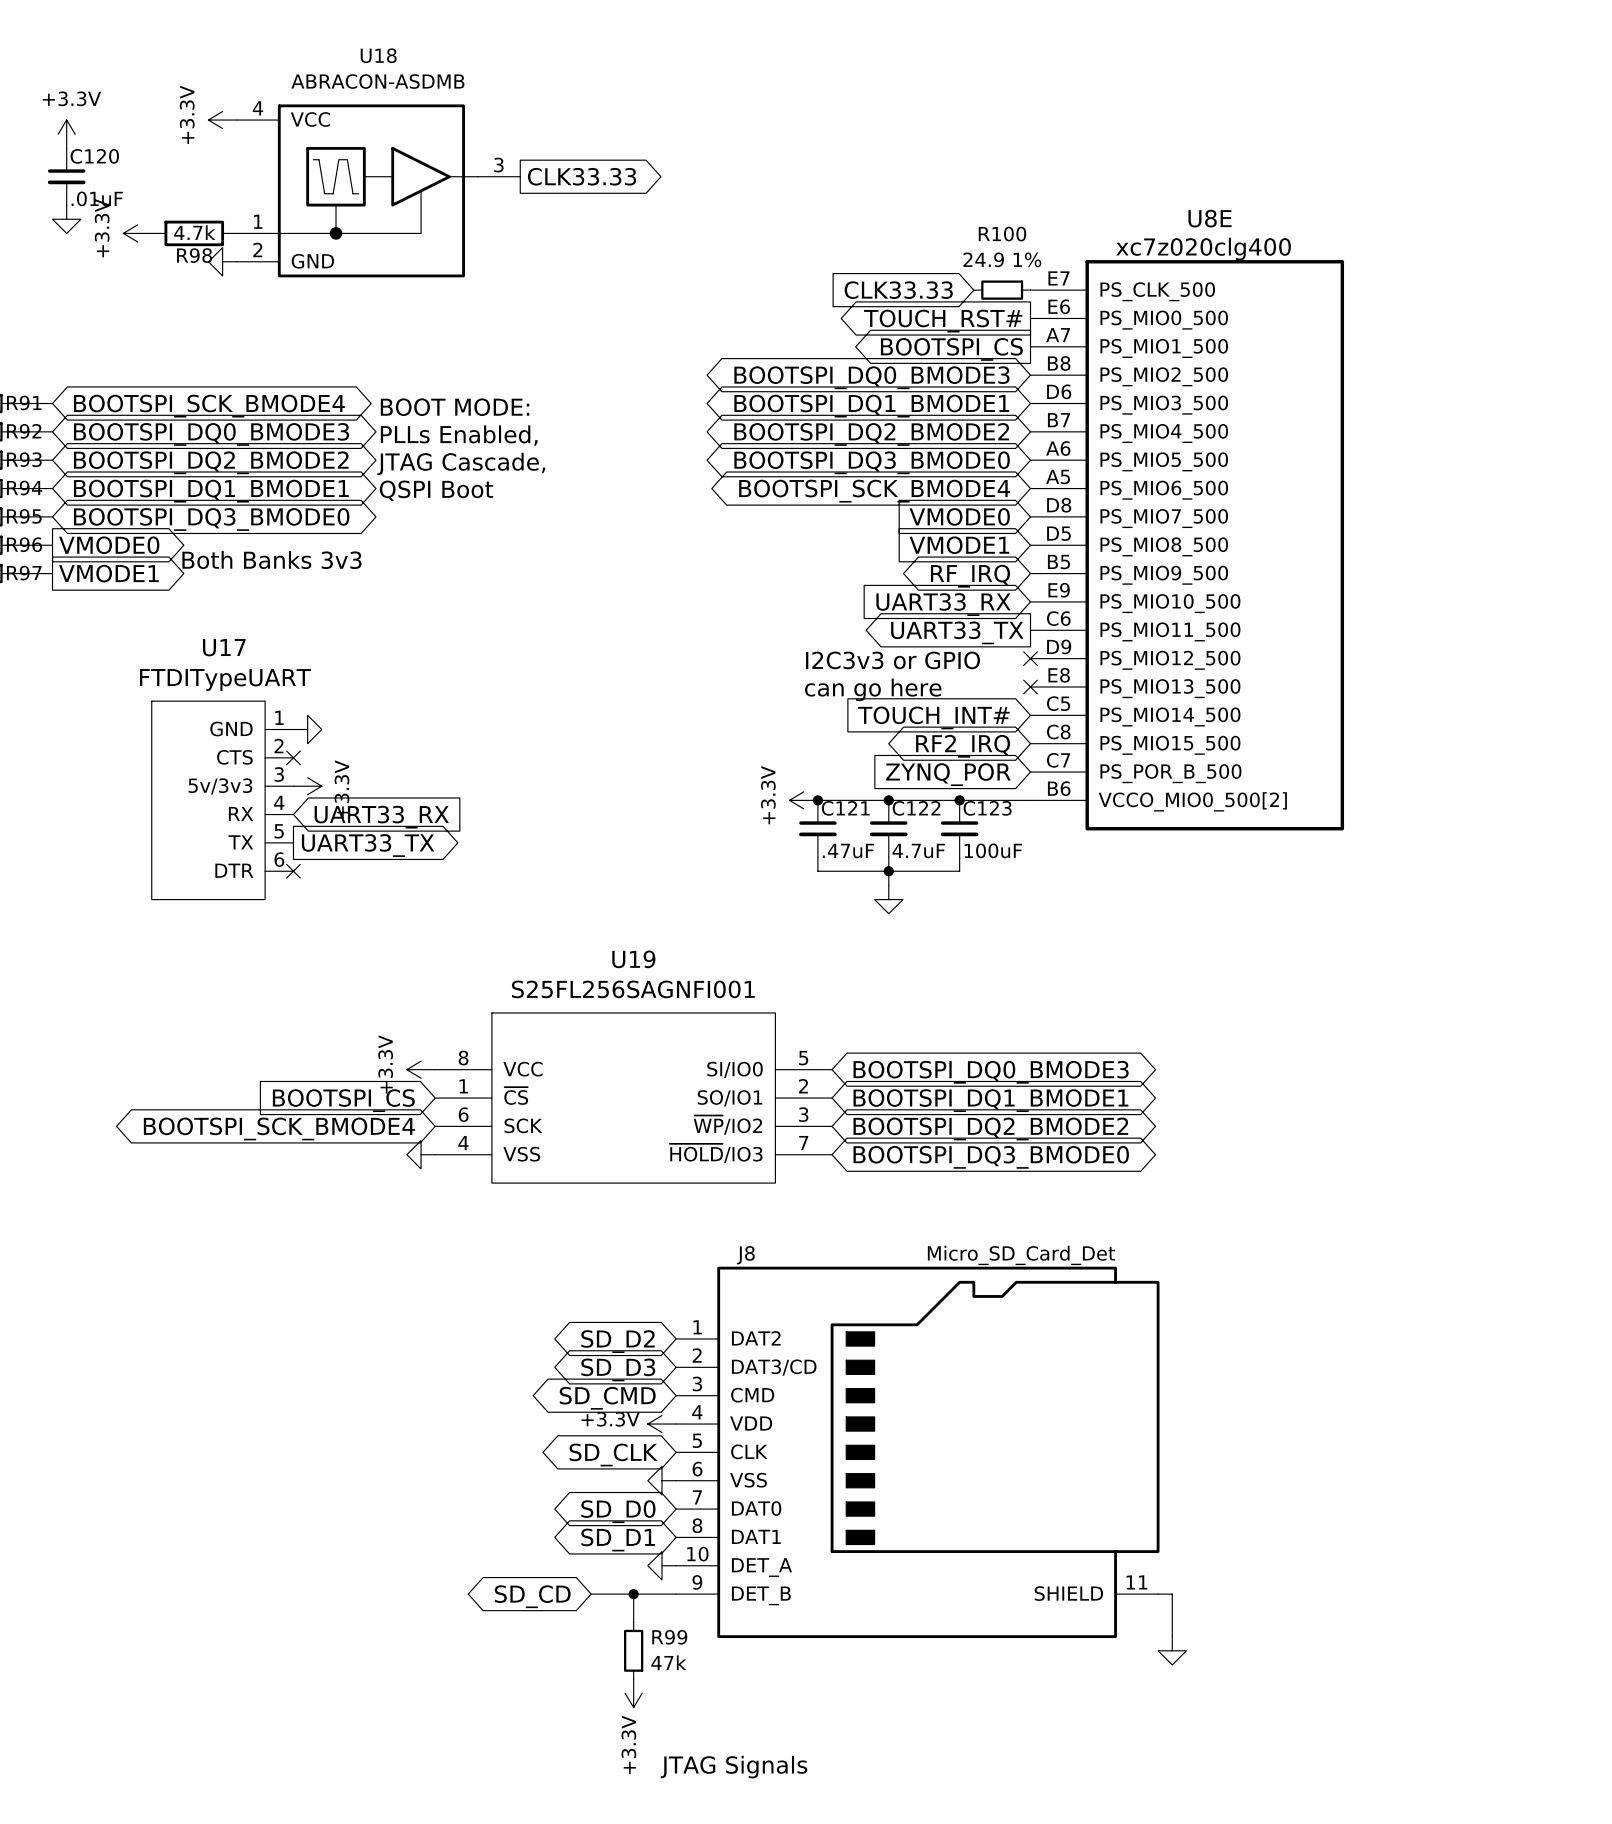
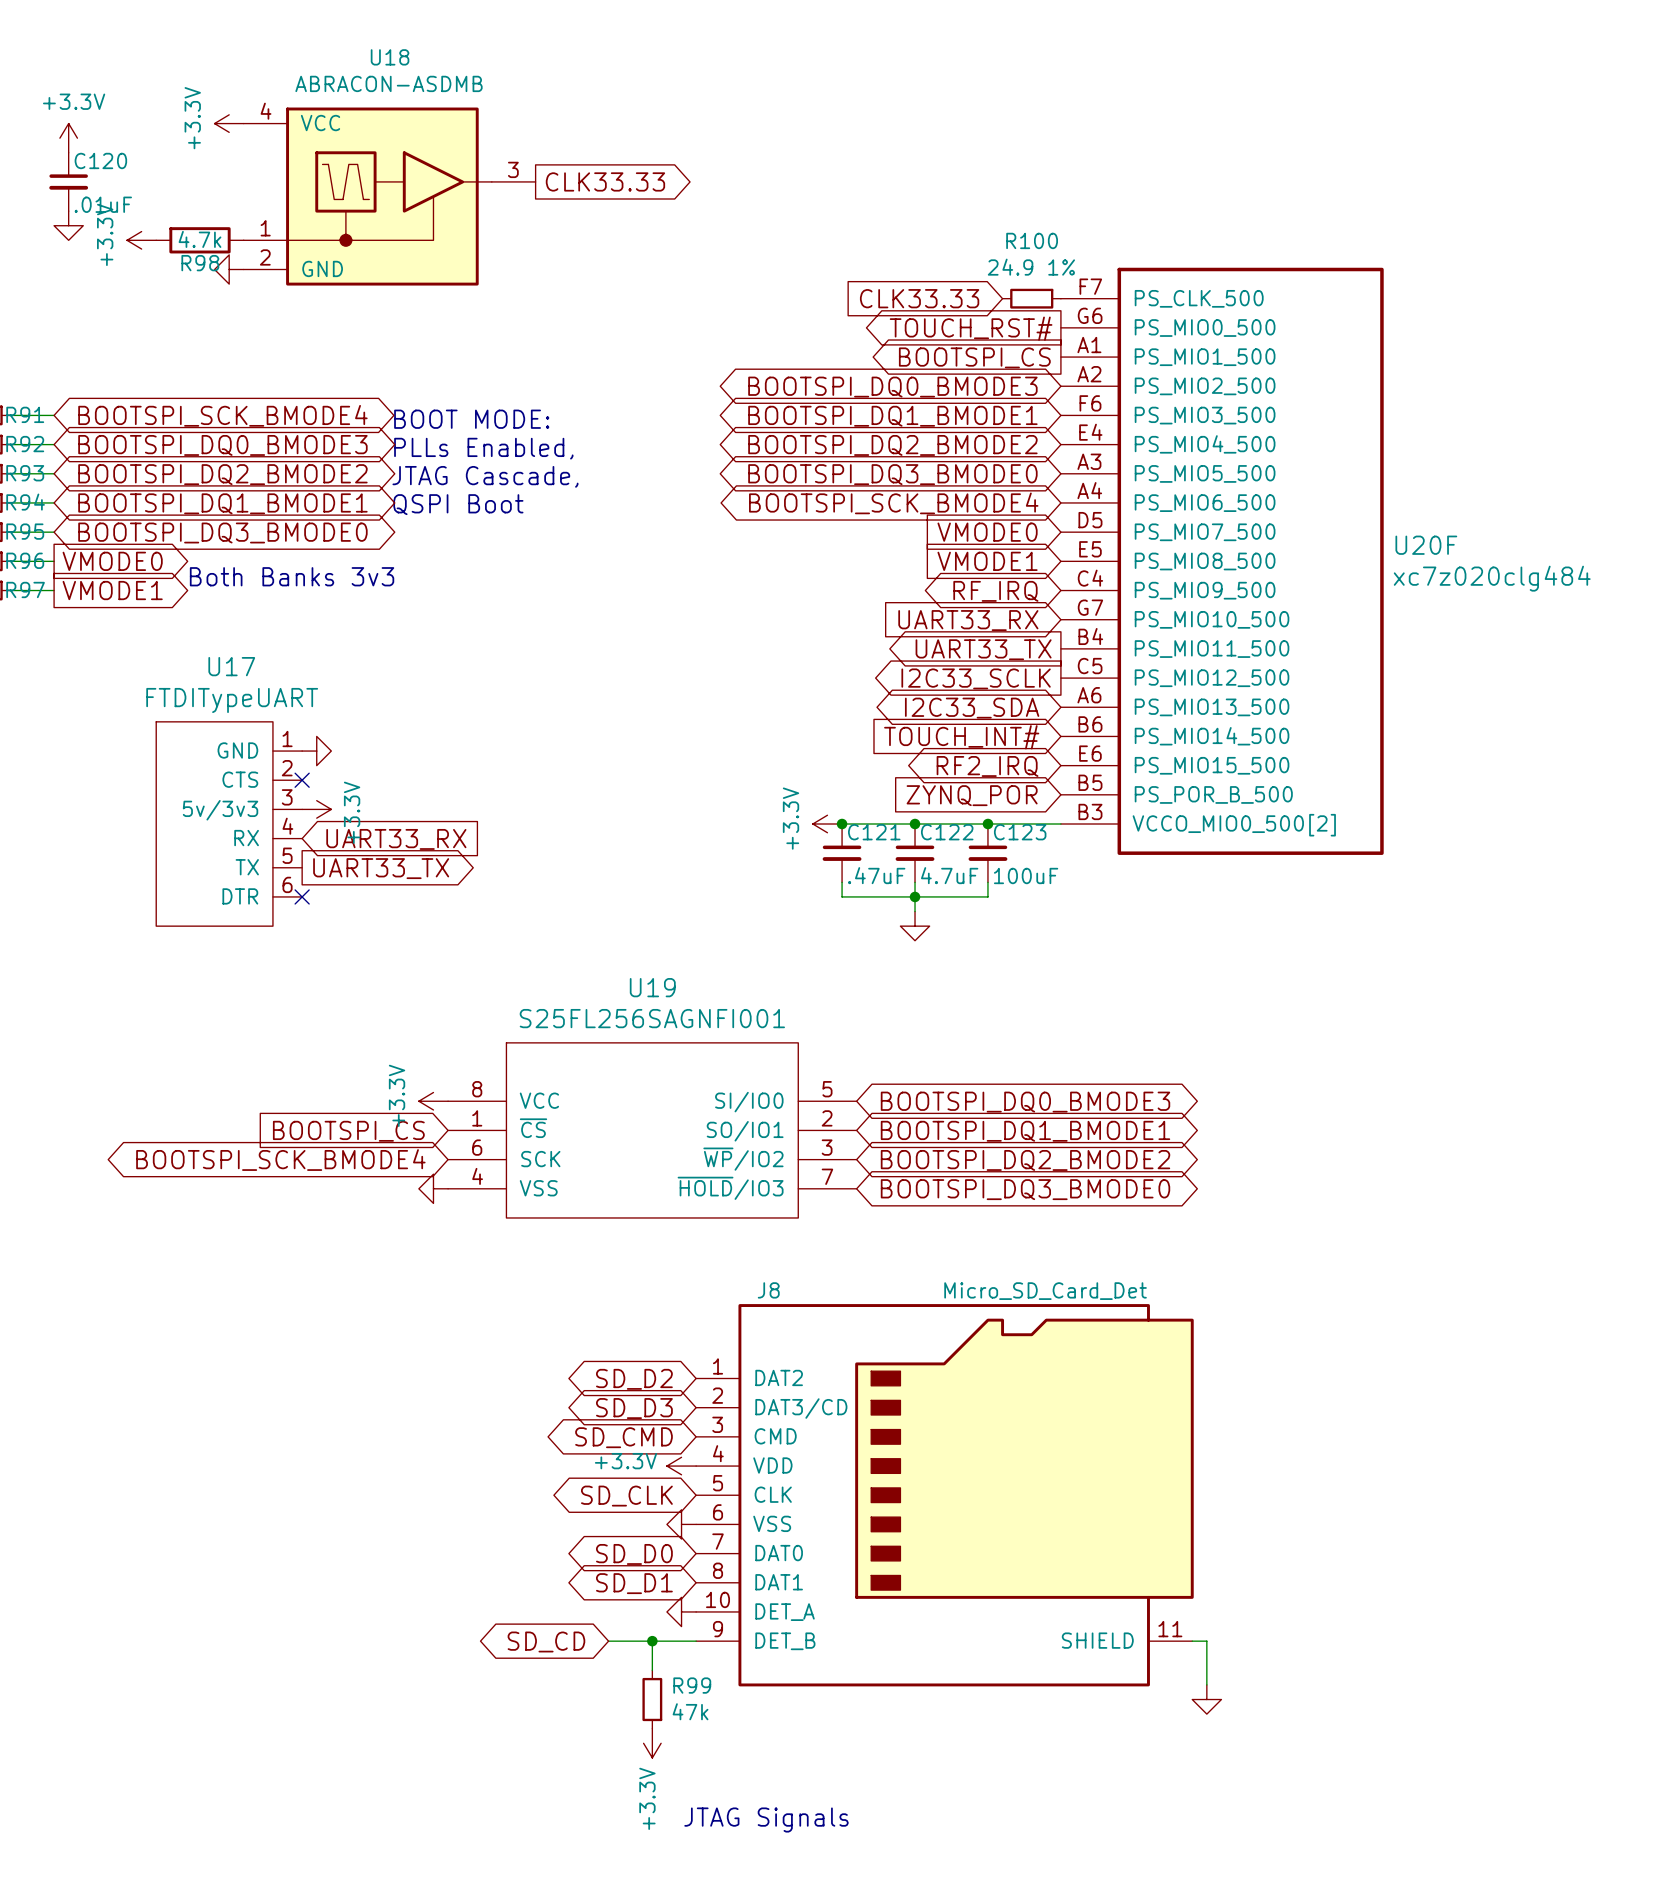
U8E name: U8E (1210, 218) -> U20F (1426, 545)
U8E value: xc7z020clg400 (1203, 249) -> xc7z020clg484 (1492, 578)
U8E symbol: [1030, 260, 1345, 831] -> [1060, 267, 1384, 855]
no-connect mark: (1030, 658) -> none
text: I2C3v3 or GPIO (893, 660) -> none
global label: none -> I2C33_SCLK (976, 678)
no-connect mark: (1030, 686) -> none
text: can go here (873, 689) -> none
global label: none -> I2C33_SDA (972, 708)

